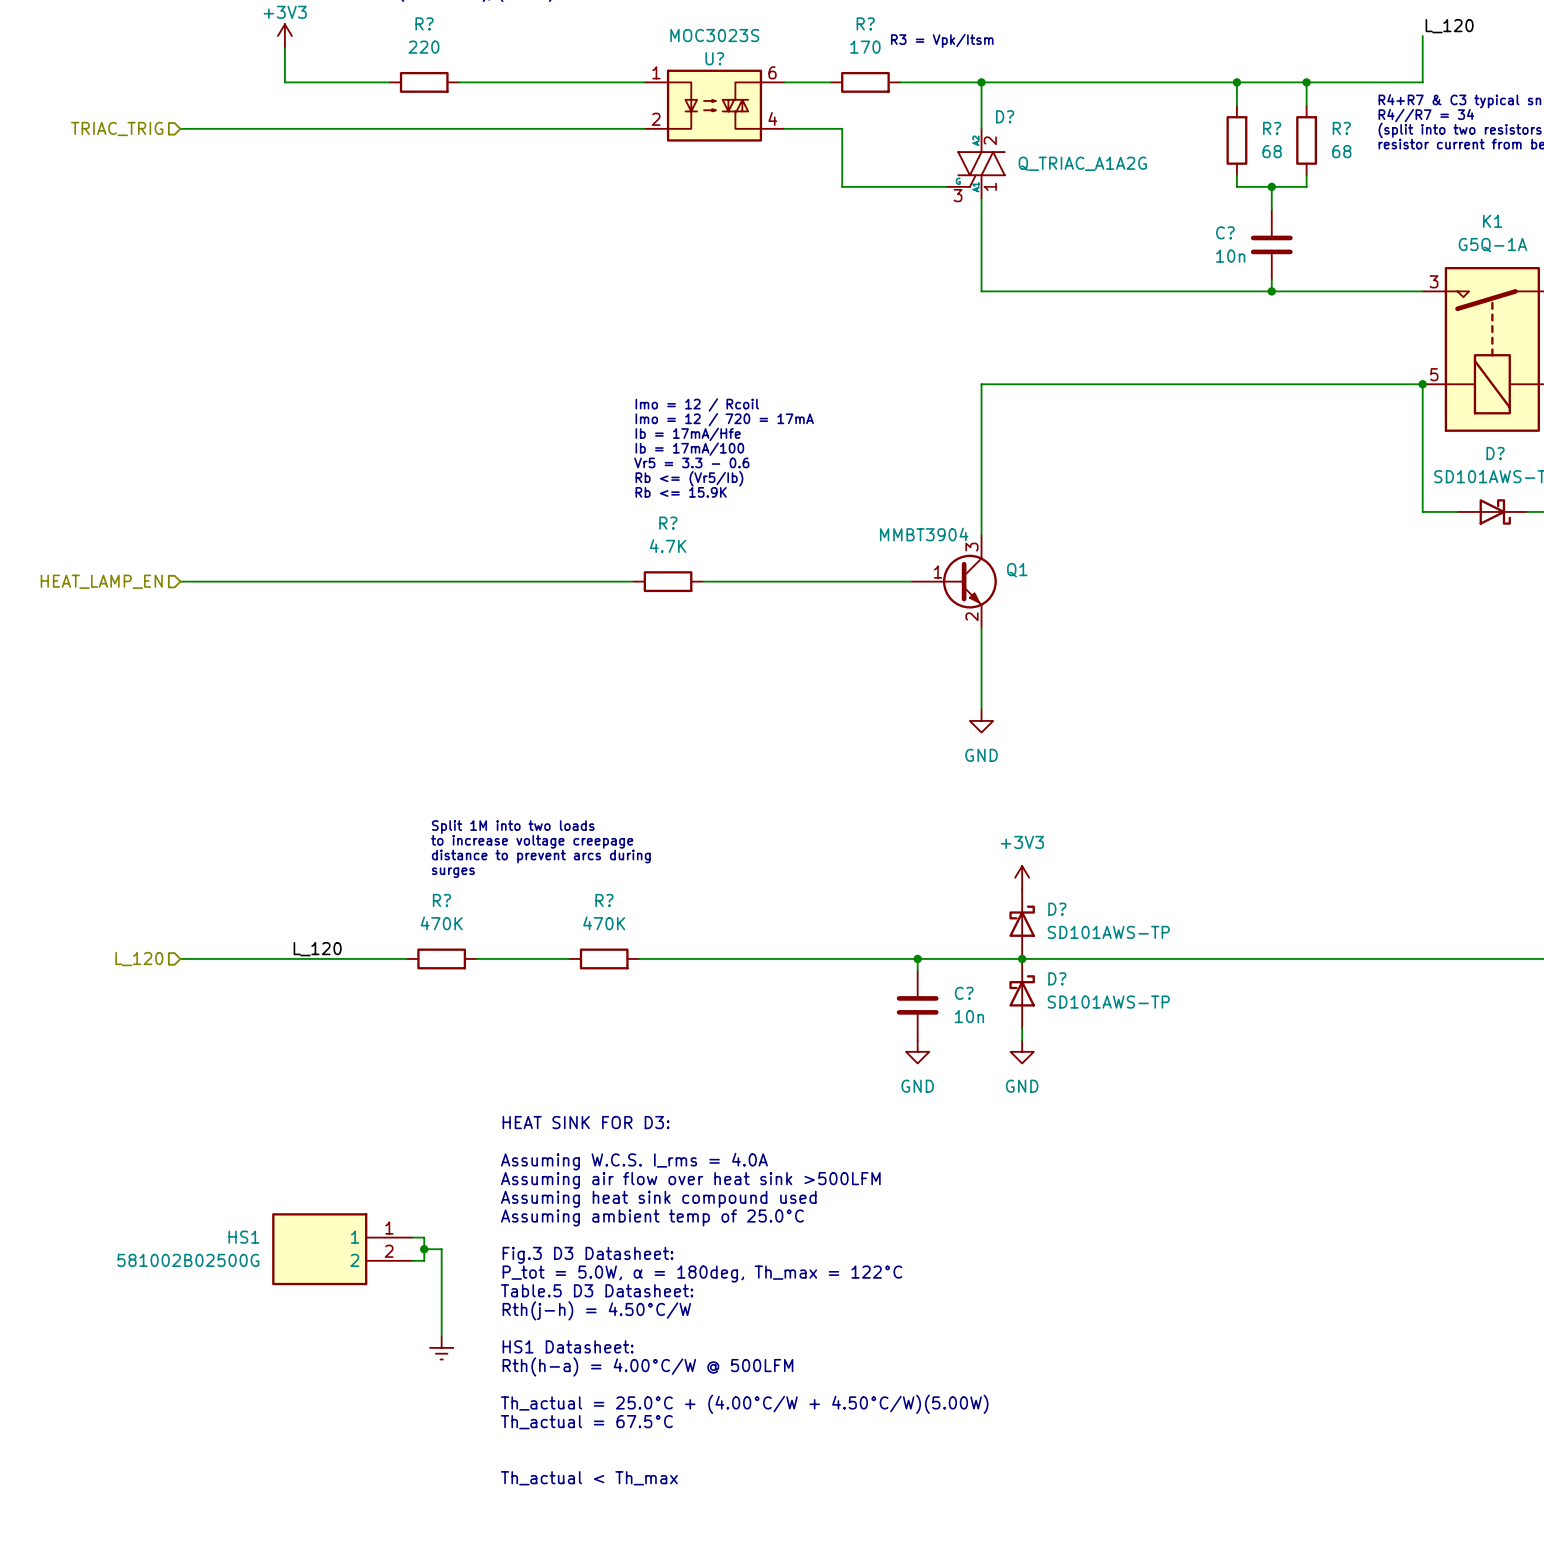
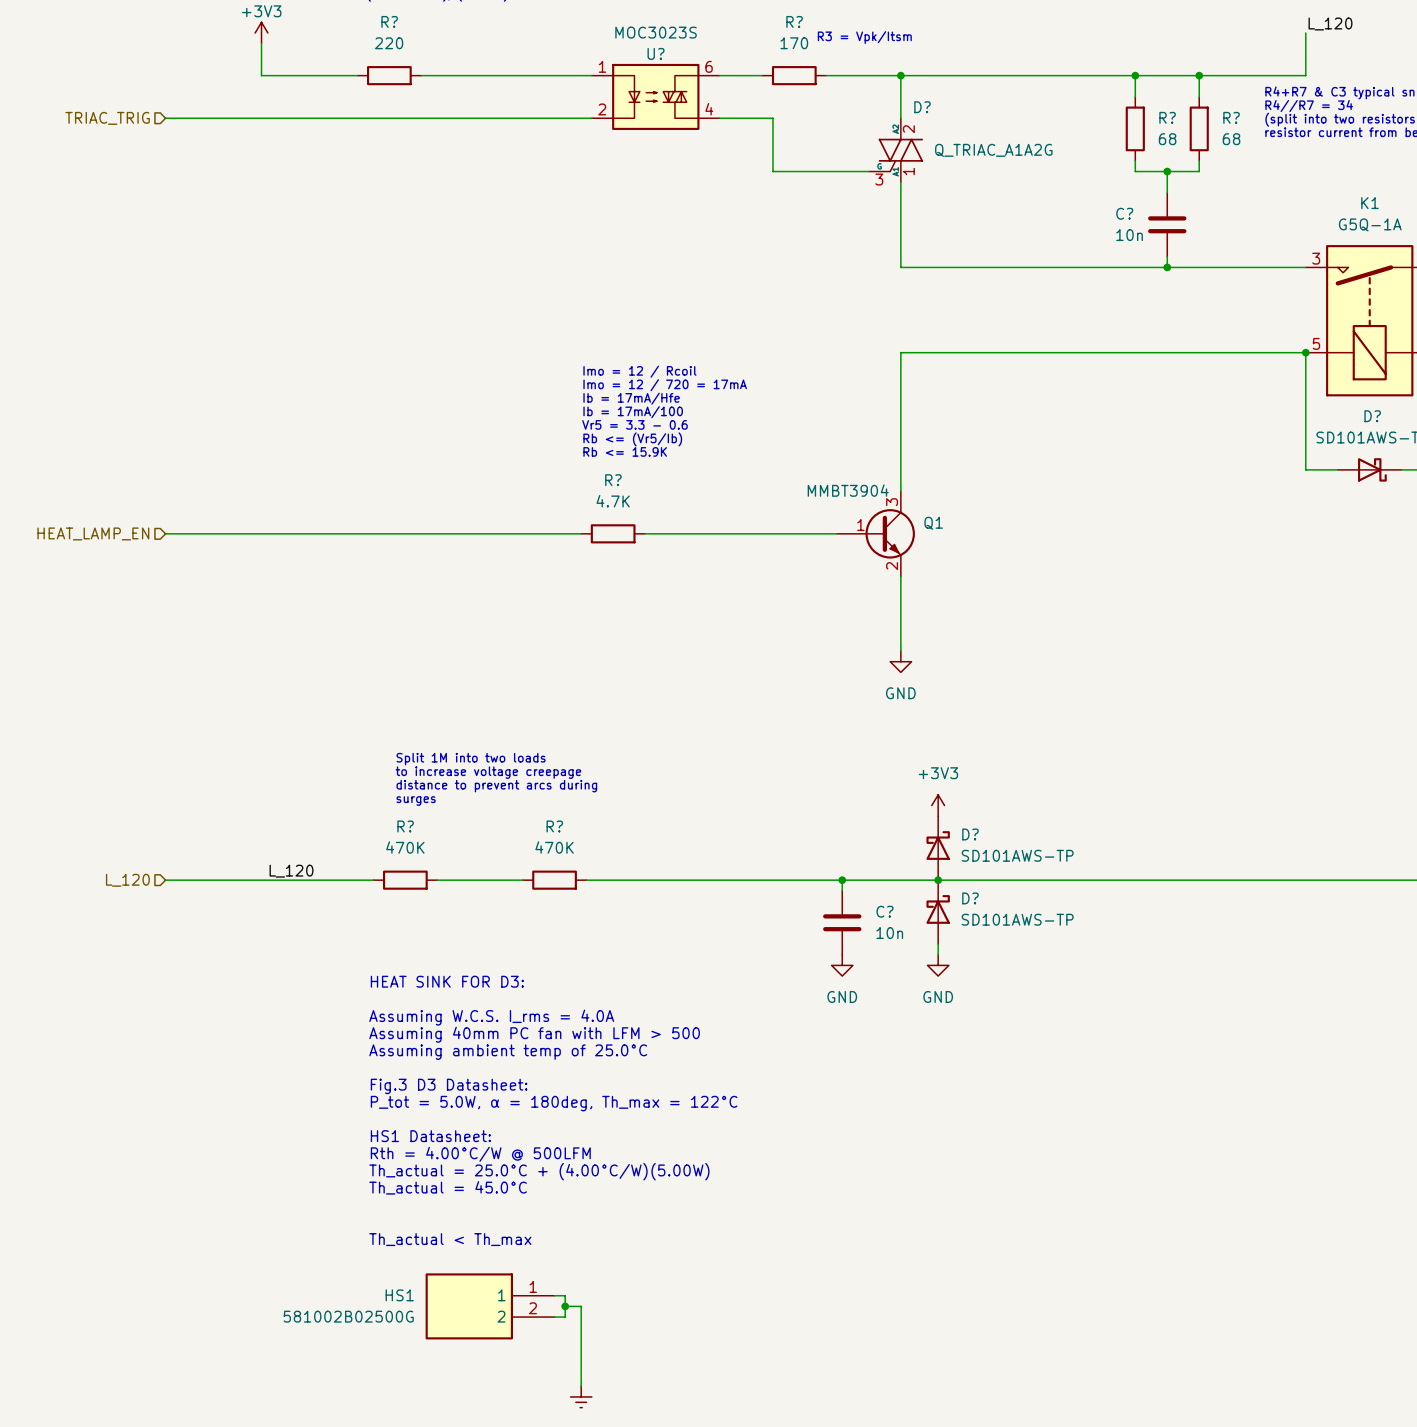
text position: HEAT SINK FOR D3: (586, 1122) -> HEAT SINK FOR D3: (447, 981)
text: none -> Assuming 40mm PC fan with LFM > 500 (534, 1034)
text position: Assuming W.C.S. I_rms = 4.0A (634, 1161) -> Assuming W.C.S. I_rms = 4.0A (491, 1017)
text: Assuming air flow over heat sink >500LFM (690, 1180) -> none
text: Assuming heat sink compound used (658, 1199) -> none
text position: Assuming ambient temp of 25.0°C (652, 1217) -> Assuming ambient temp of 25.0°C (508, 1052)
wire: (412, 1237) (424, 1237) (424, 1260) (412, 1260) -> none
HS1 position: (342, 1249) -> (490, 1306)
wire: (424, 1249) (441, 1249) (441, 1336) -> none
junction: (424, 1249) -> none
text position: Fig.3 D3 Datasheet: (587, 1255) -> Fig.3 D3 Datasheet: (449, 1086)
text: none -> Rth = 4.00°C/W @ 500LFM (480, 1154)
text position: P_tot = 5.0W, α = 180deg, Th_max = 122°C (702, 1274) -> P_tot = 5.0W, α = 180deg, Th_max = 122°C (554, 1103)
text: none -> Th_actual = 25.0°C + (4.00°C/W)(5.00W) (539, 1171)
text: Table.5 D3 Datasheet: (597, 1290) -> none
text: none -> Th_actual = 45.0°C (448, 1187)
text: Rth(j-h) = 4.50°C/W (596, 1310) -> none
text position: HS1 Datasheet: (568, 1346) -> HS1 Datasheet: (430, 1136)
power symbol: (441, 1347) -> none
text: Rth(h-a) = 4.00°C/W @ 500LFM (647, 1366) -> none
text: Th_actual = 25.0°C + (4.00°C/W + 4.50°C/W)(5.00W) (744, 1404) -> none
wire: none -> (554, 1295) (565, 1295) (565, 1317) (554, 1317)
text: Th_actual = 67.5°C (586, 1422) -> none
wire: none -> (565, 1306) (581, 1306) (581, 1386)
junction: none -> (565, 1306)
text position: Th_actual < Th_max (589, 1478) -> Th_actual < Th_max (450, 1239)
power symbol: none -> (581, 1396)

